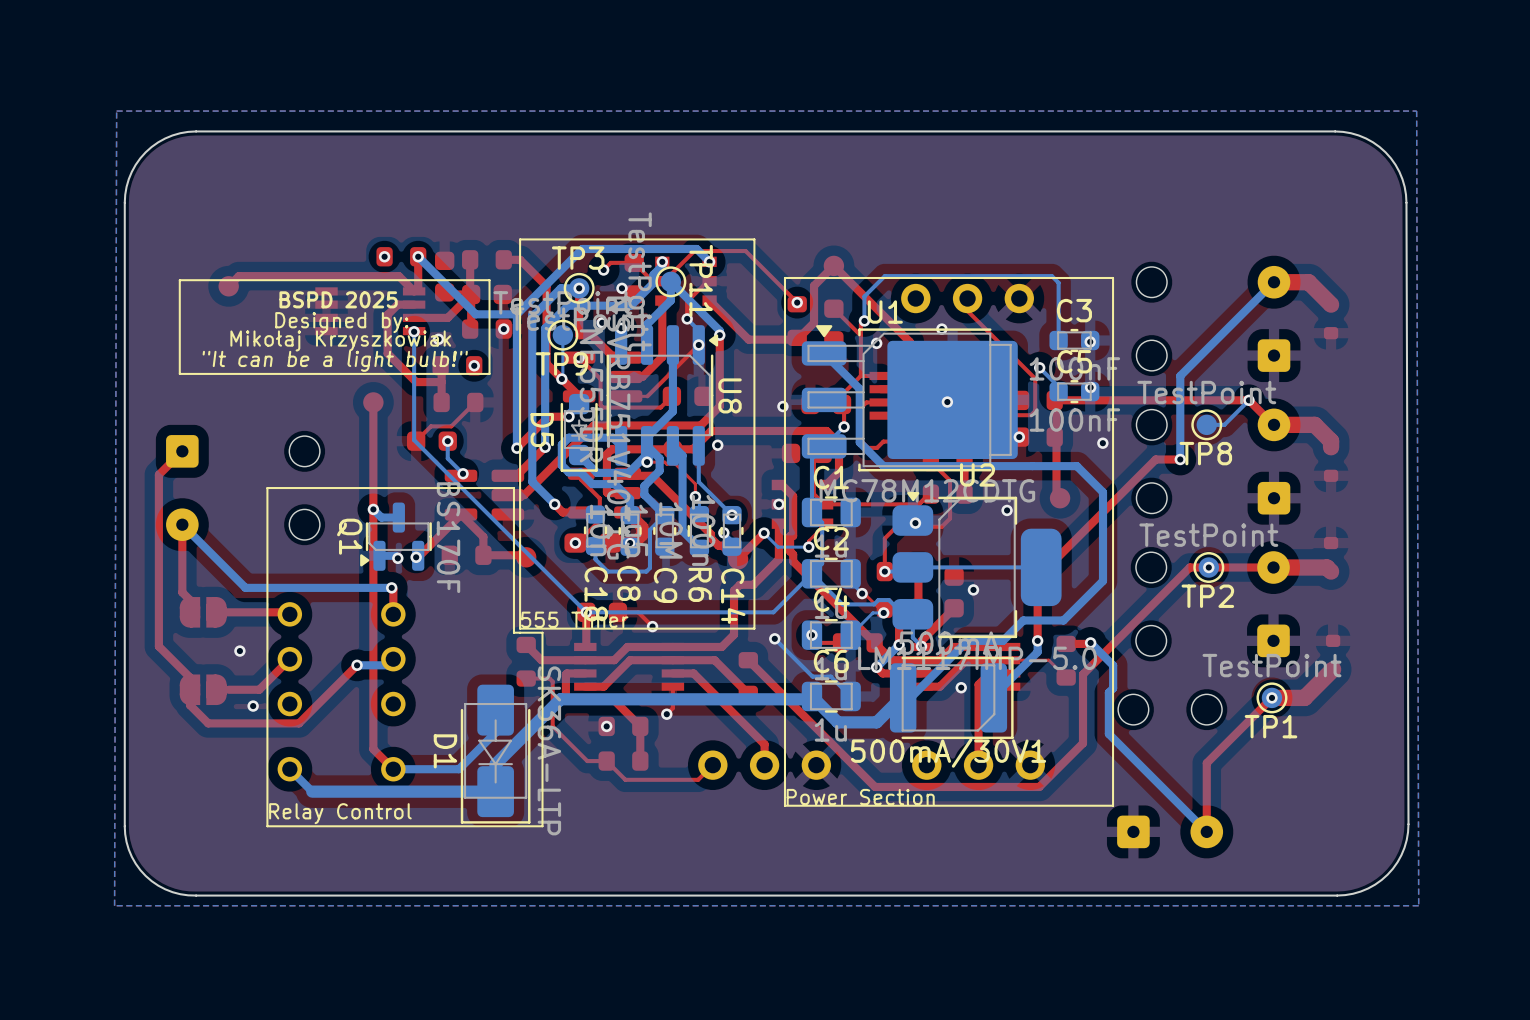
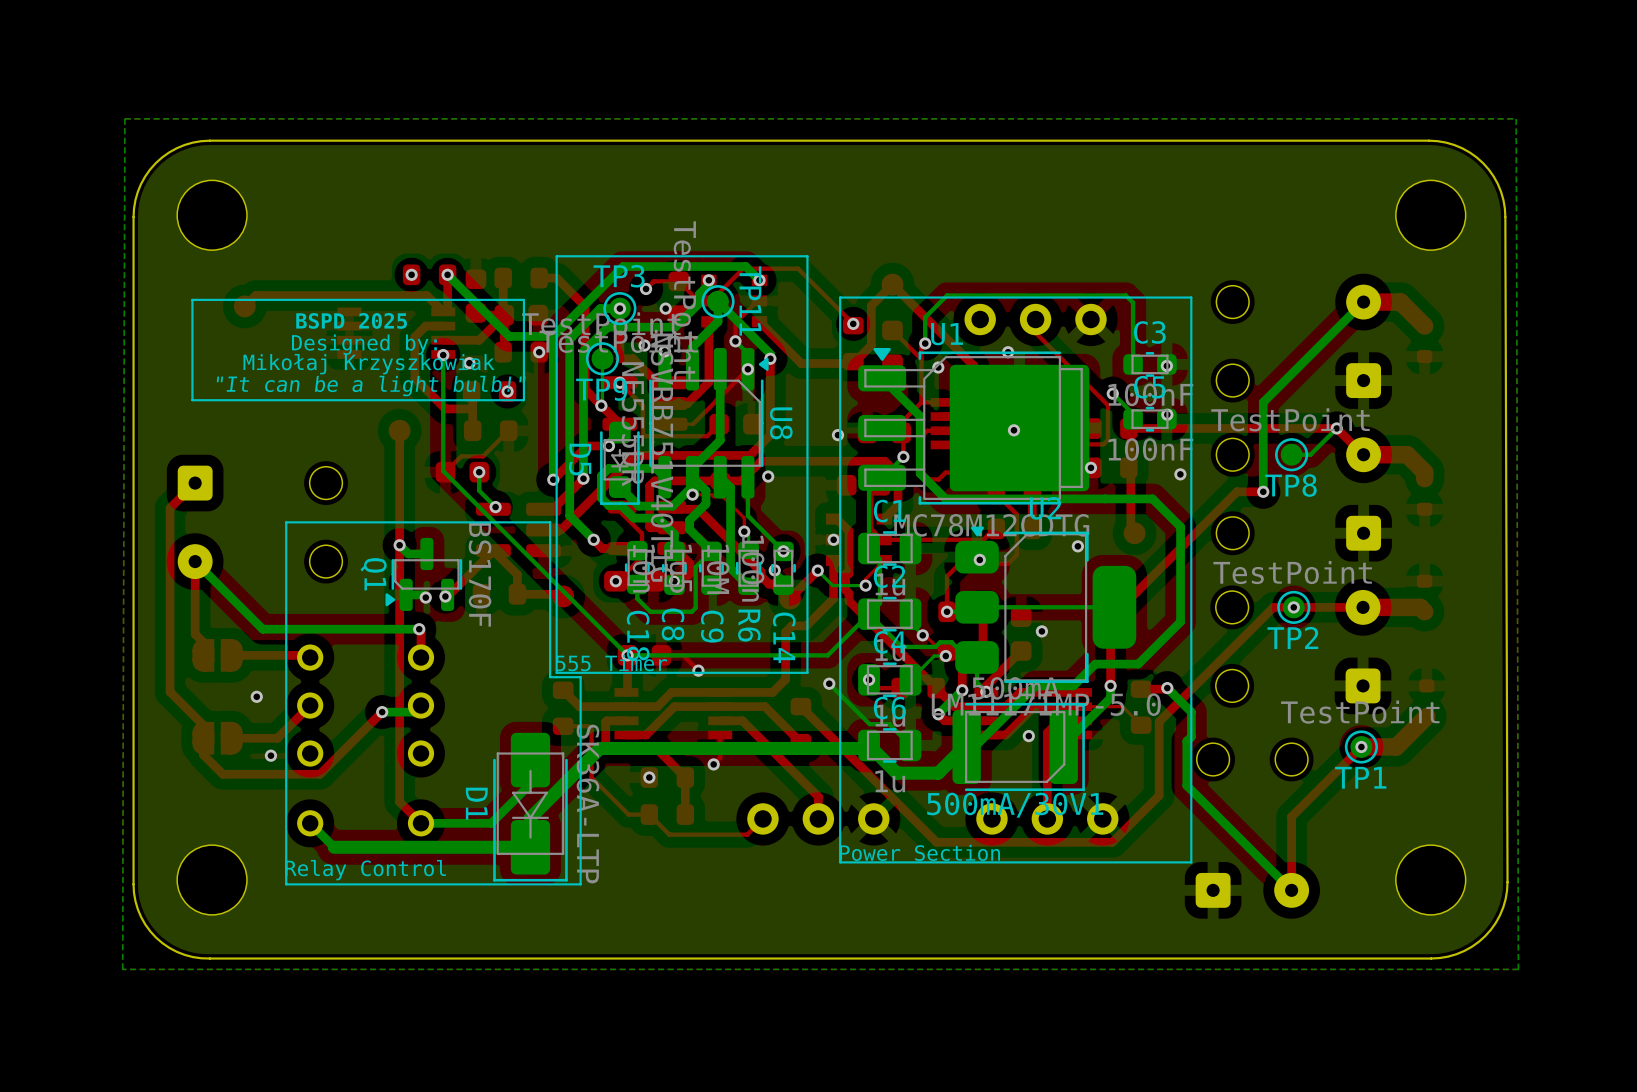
part: none -> (212, 215)
part: none -> (1430, 215)
part: none -> (212, 880)
part: none -> (1430, 880)

